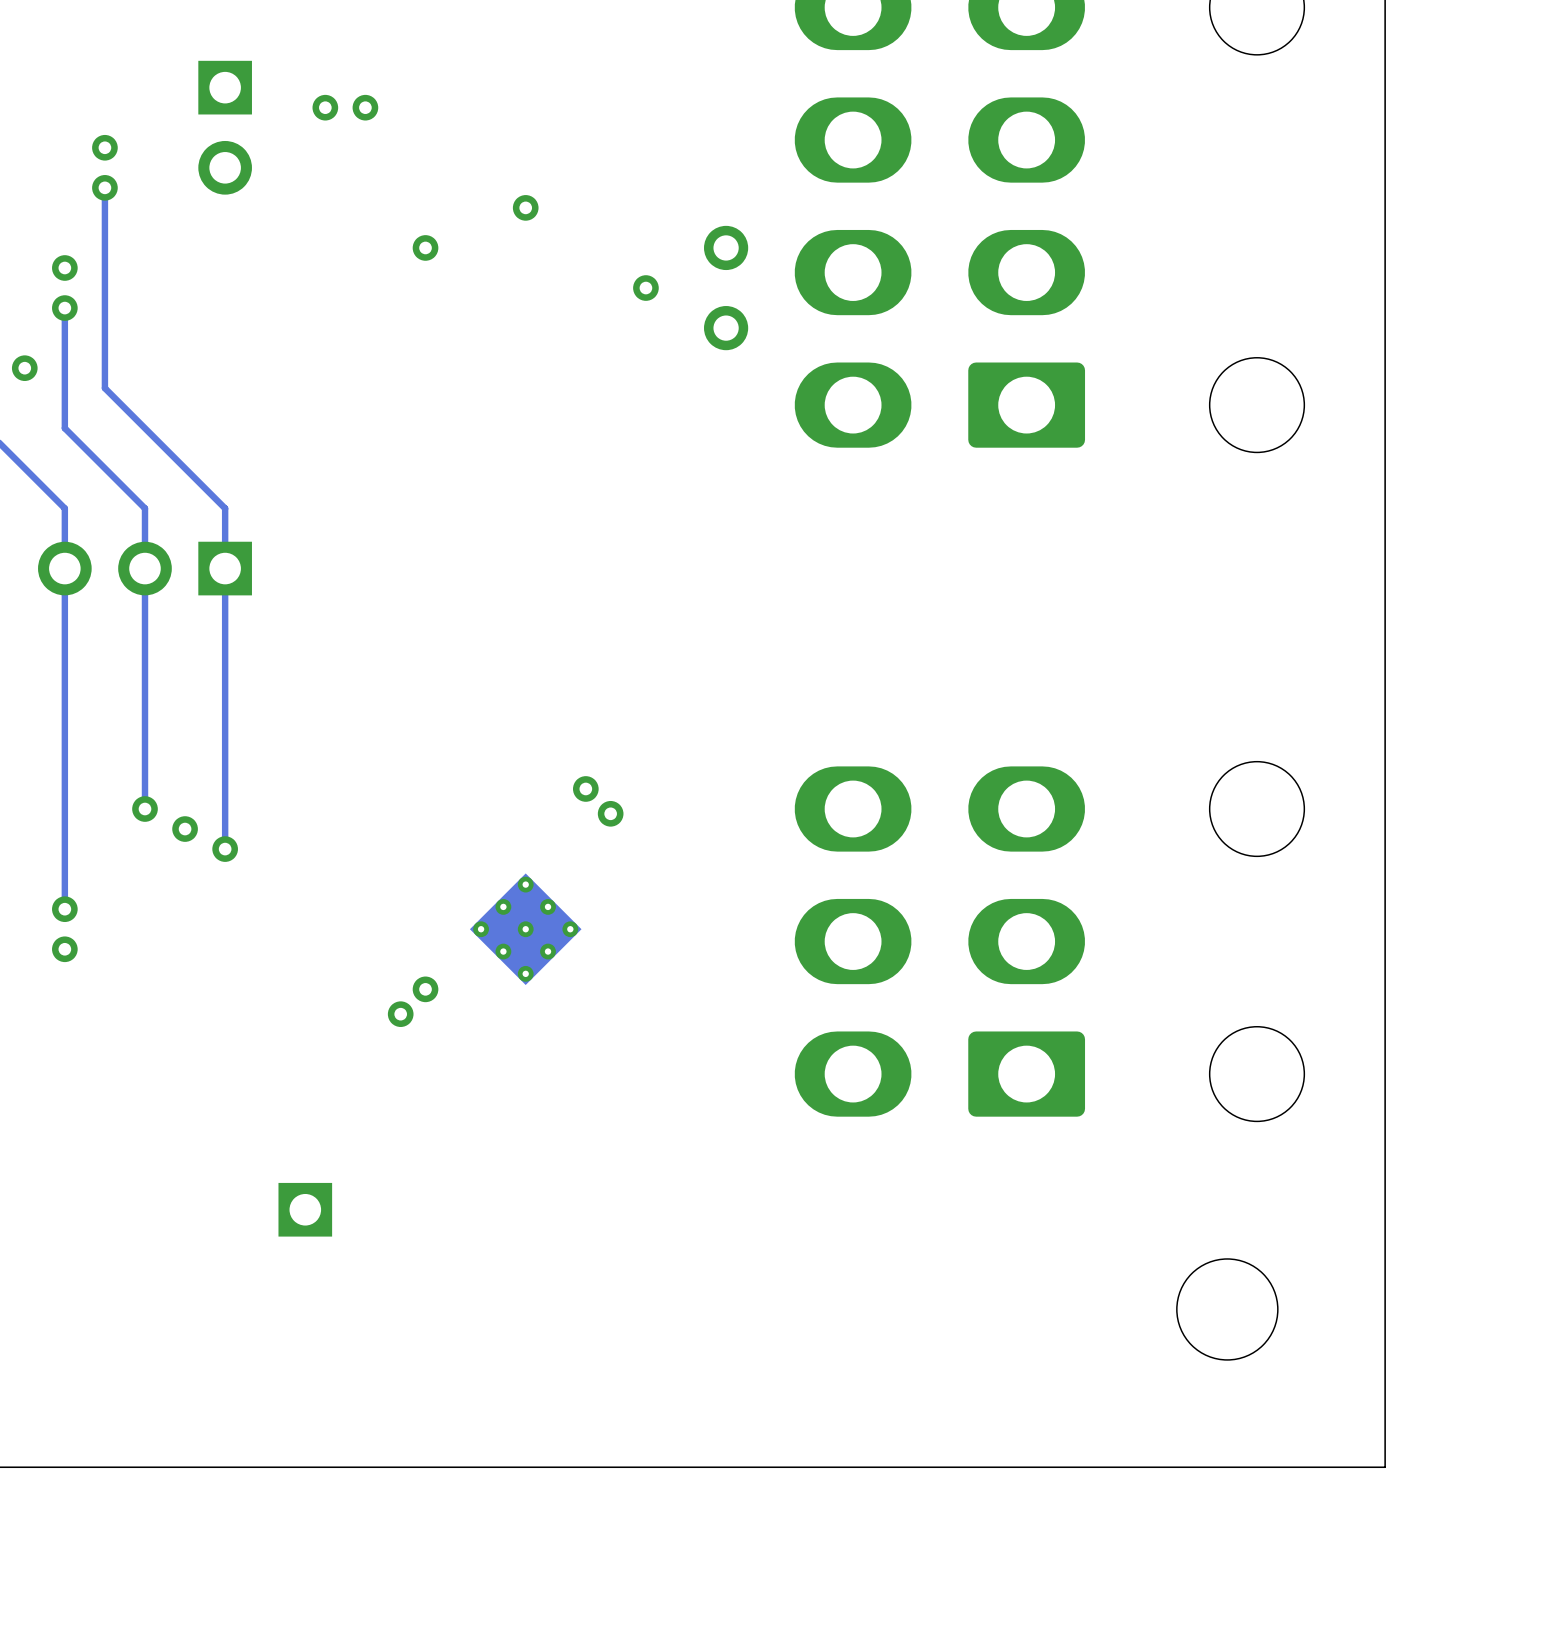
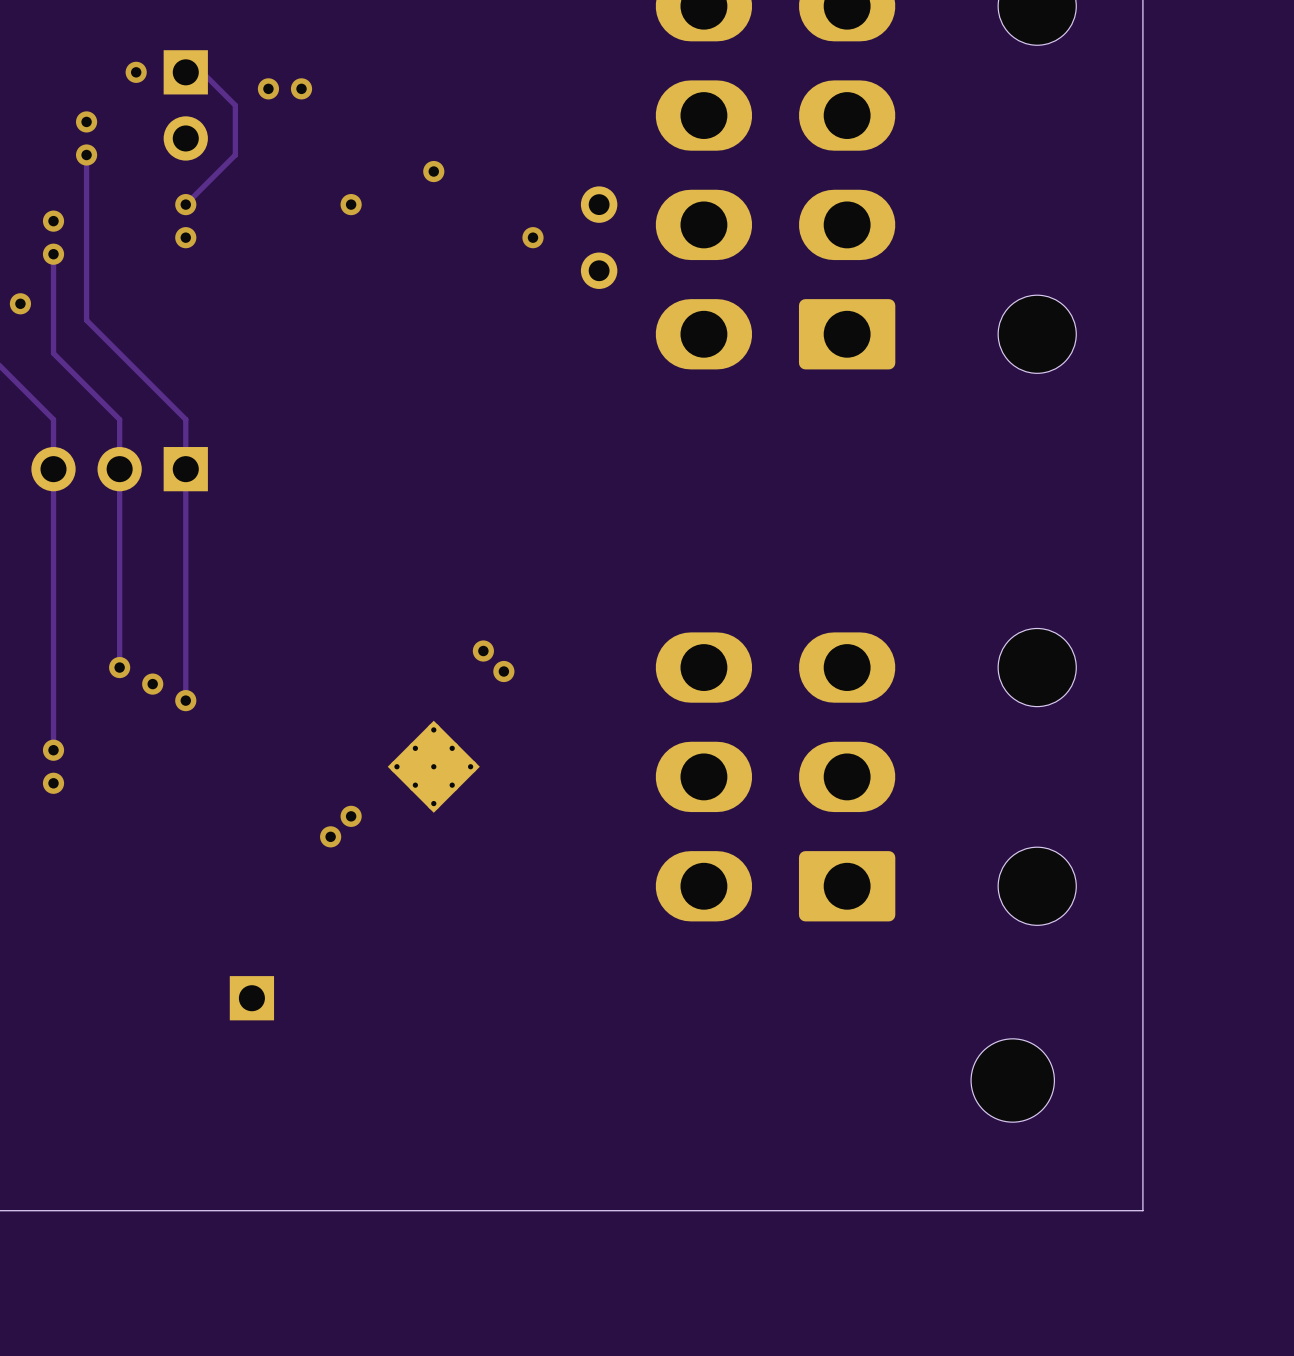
via: none -> (136, 72)
track: none -> (185, 72) (202, 72) (235, 105) (235, 155) (185, 204)
via: none -> (185, 204)
via: none -> (185, 237)

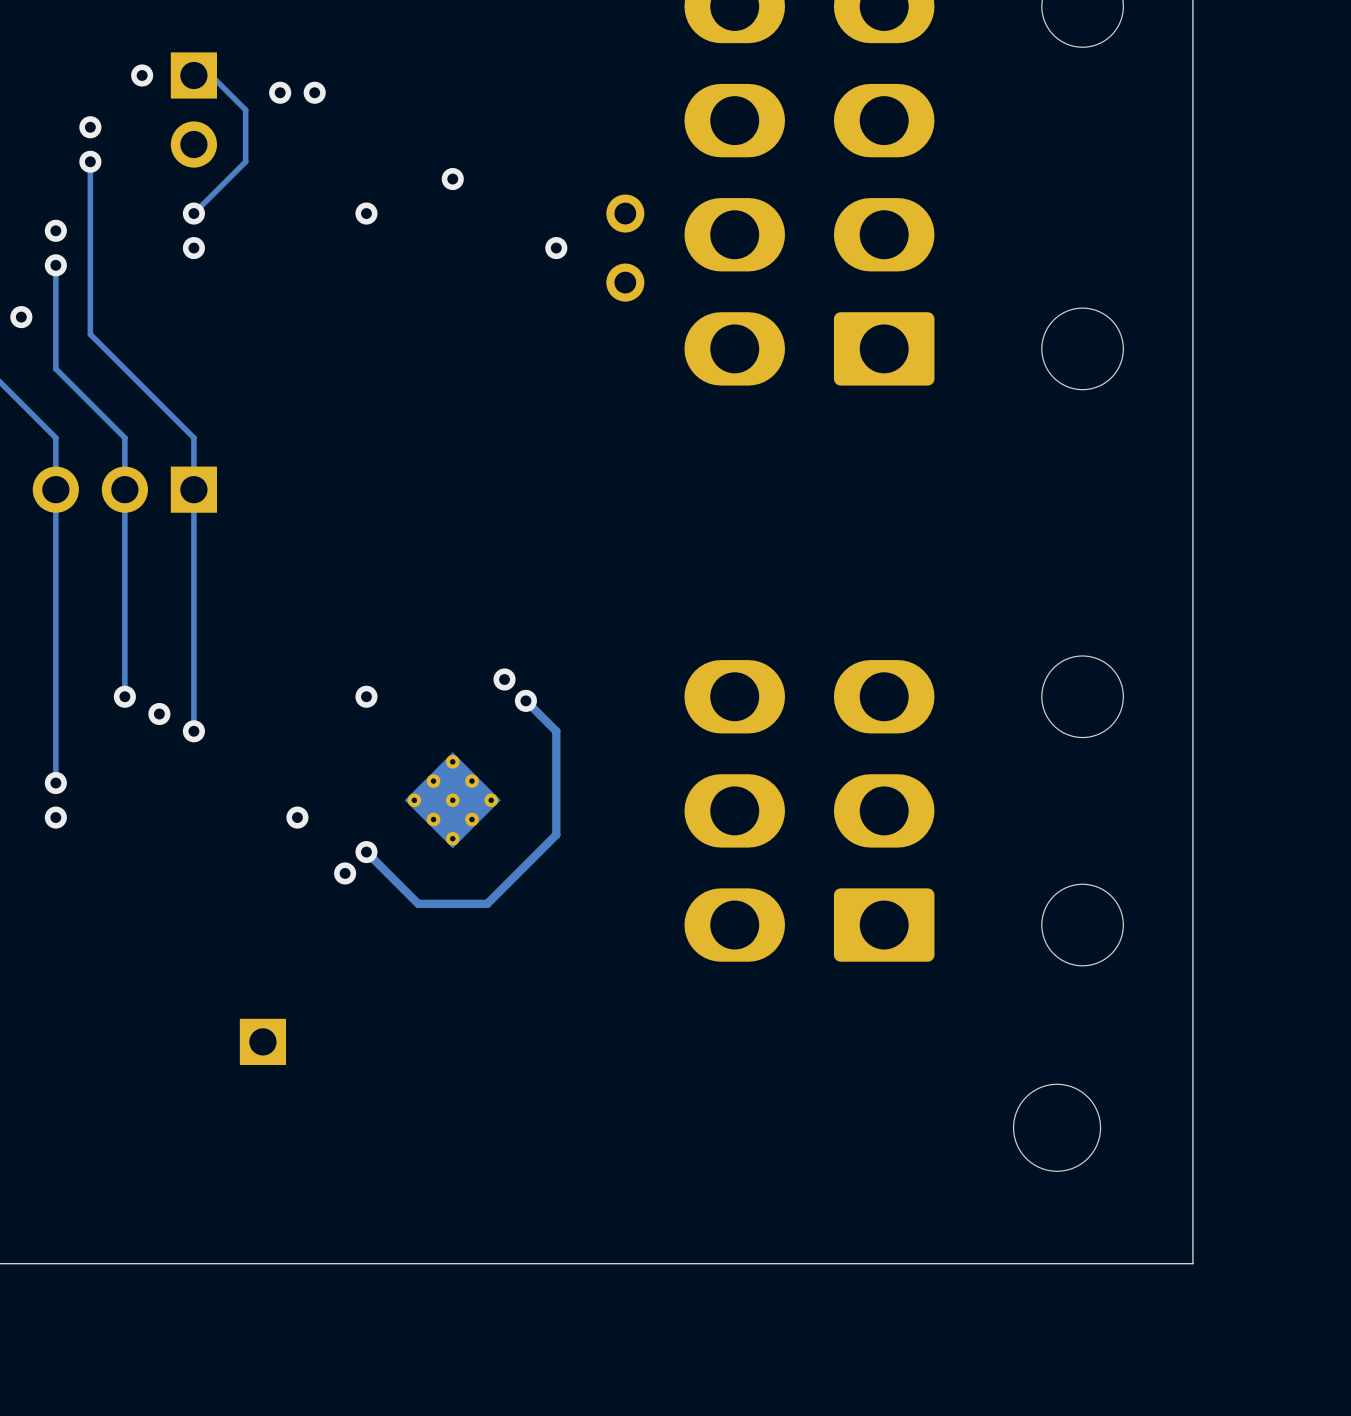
via: none -> (366, 696)
track: none -> (525, 700) (556, 731) (556, 834) (487, 903) (418, 903) (366, 852)
via: none -> (297, 817)

